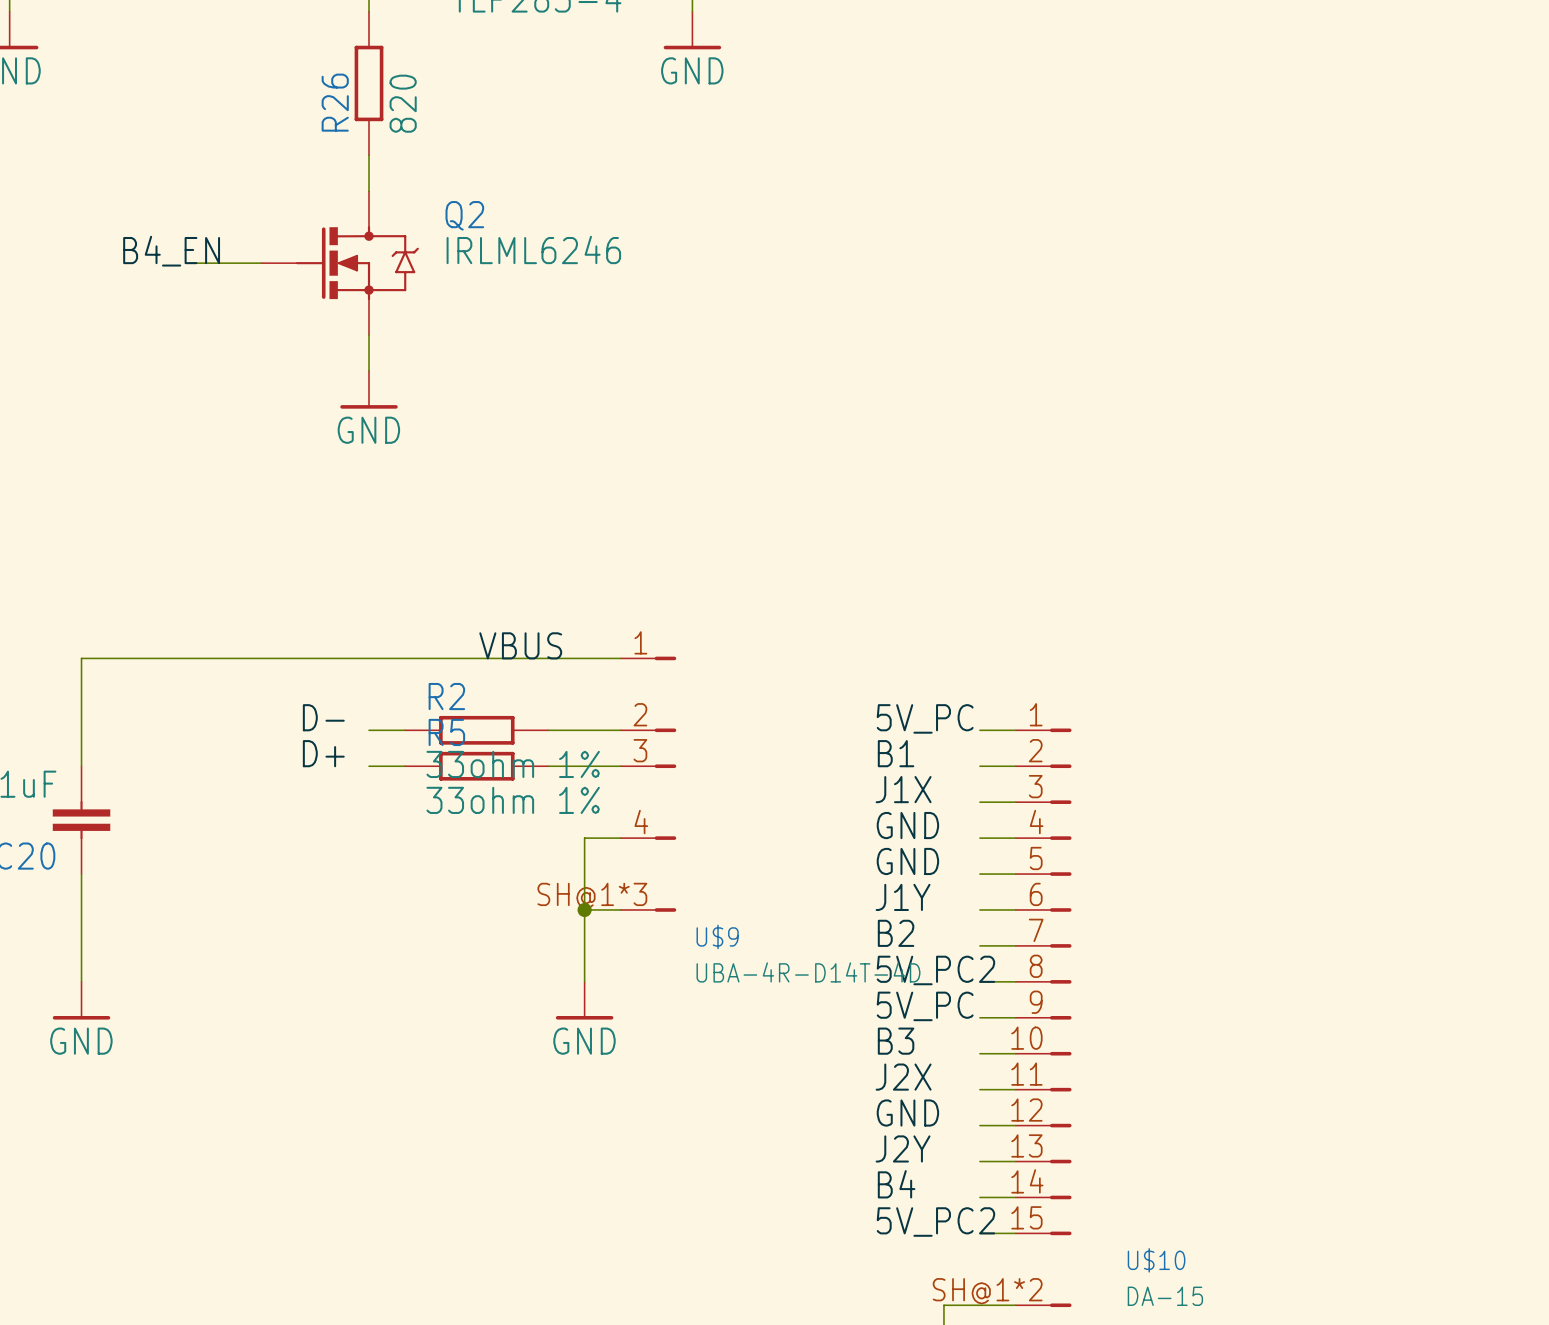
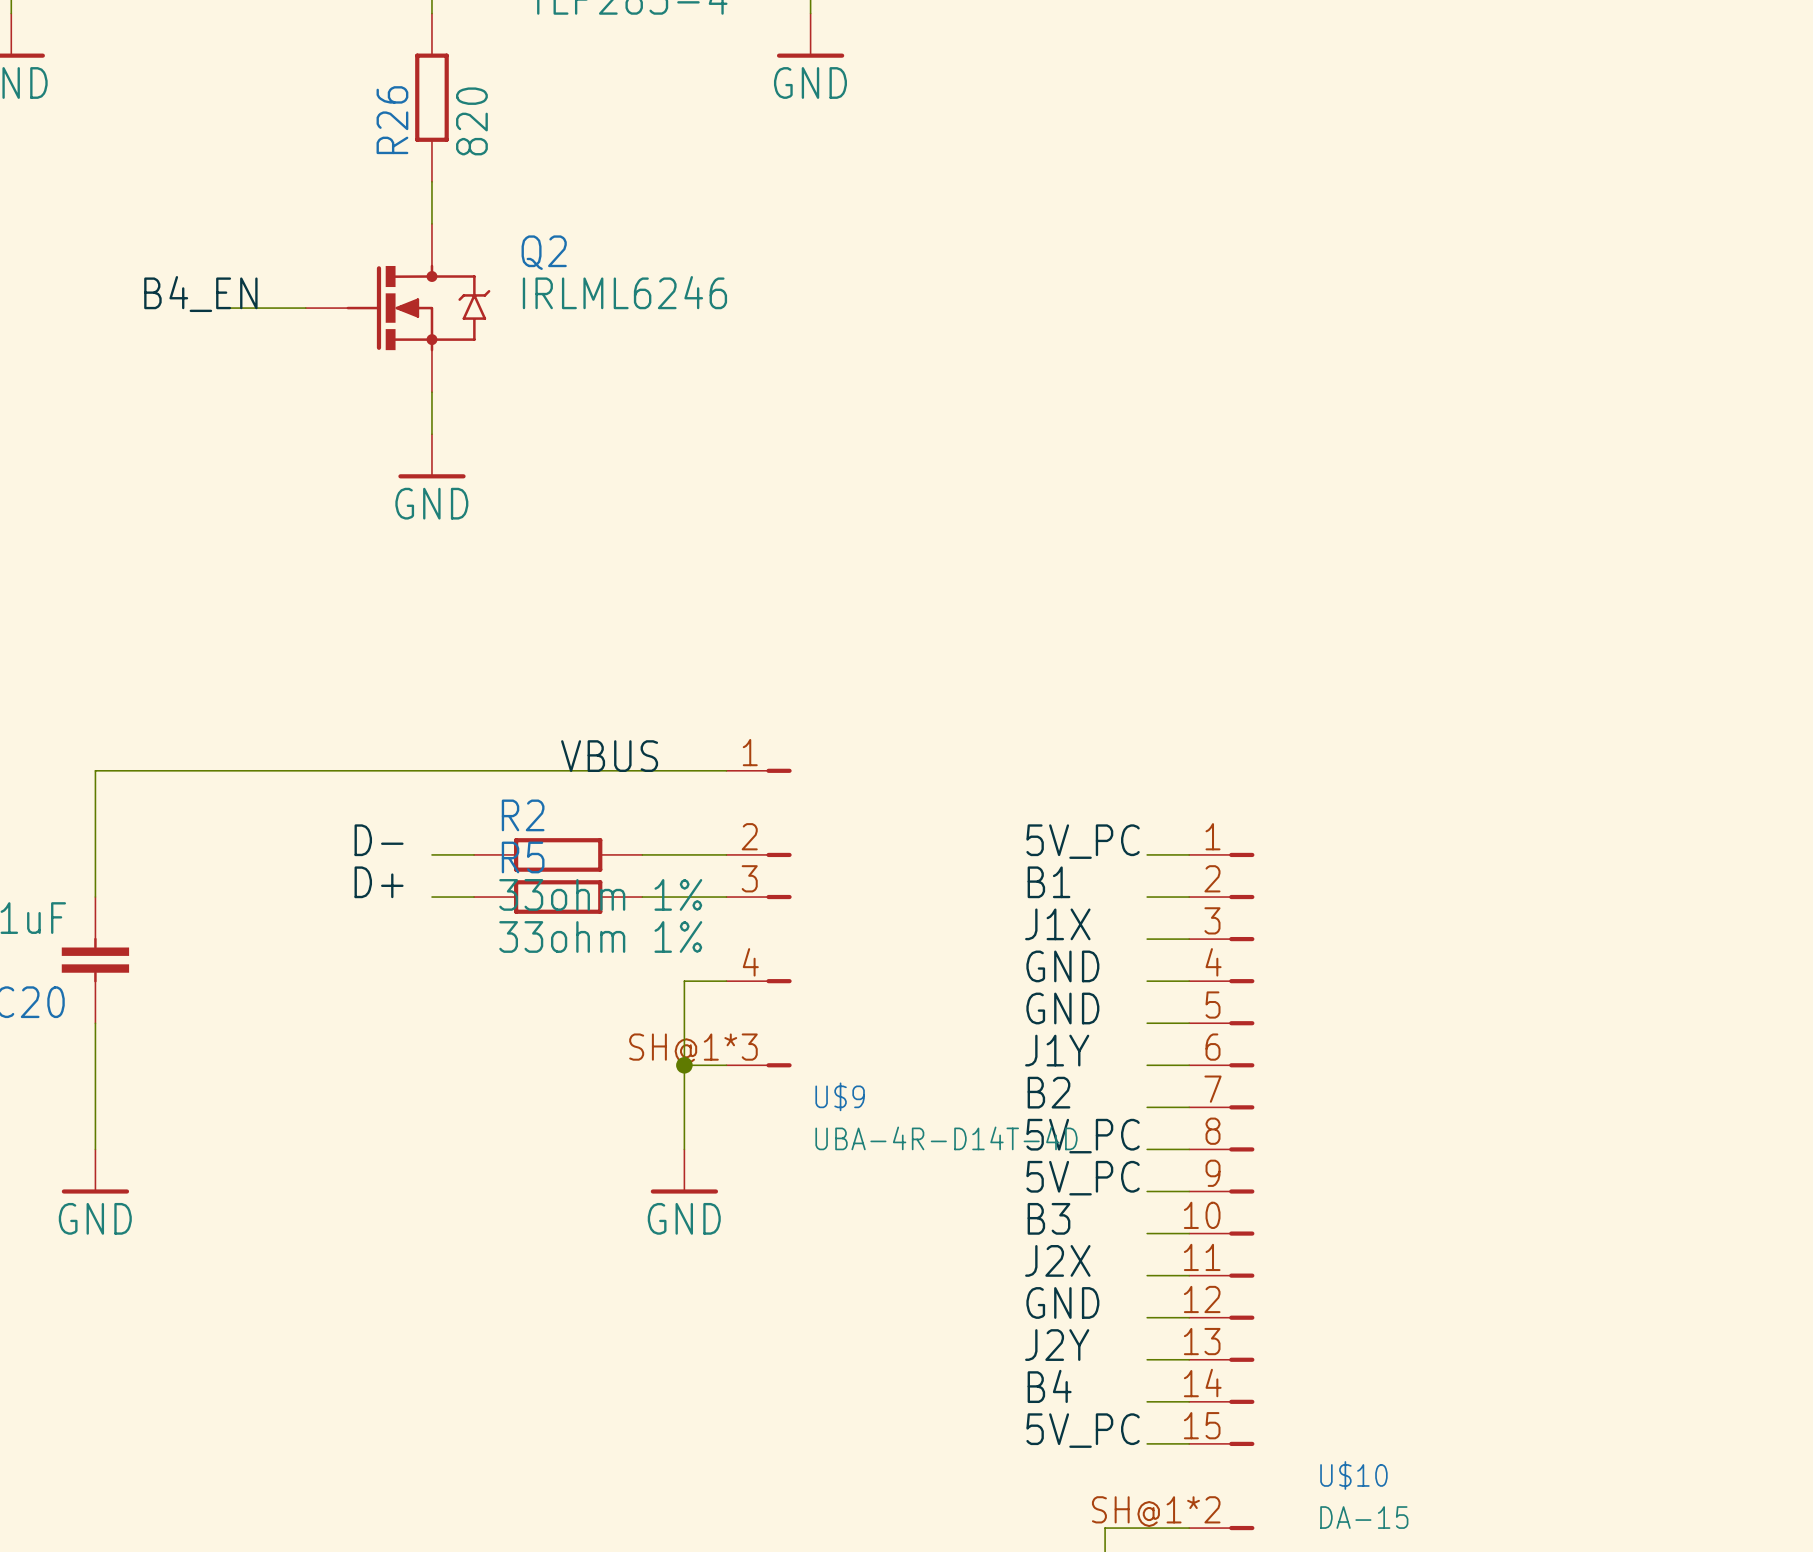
label: 5V_PC2 (935, 970) -> 5V_PC (1083, 1136)
label: 5V_PC2 (935, 1222) -> 5V_PC (1083, 1430)

